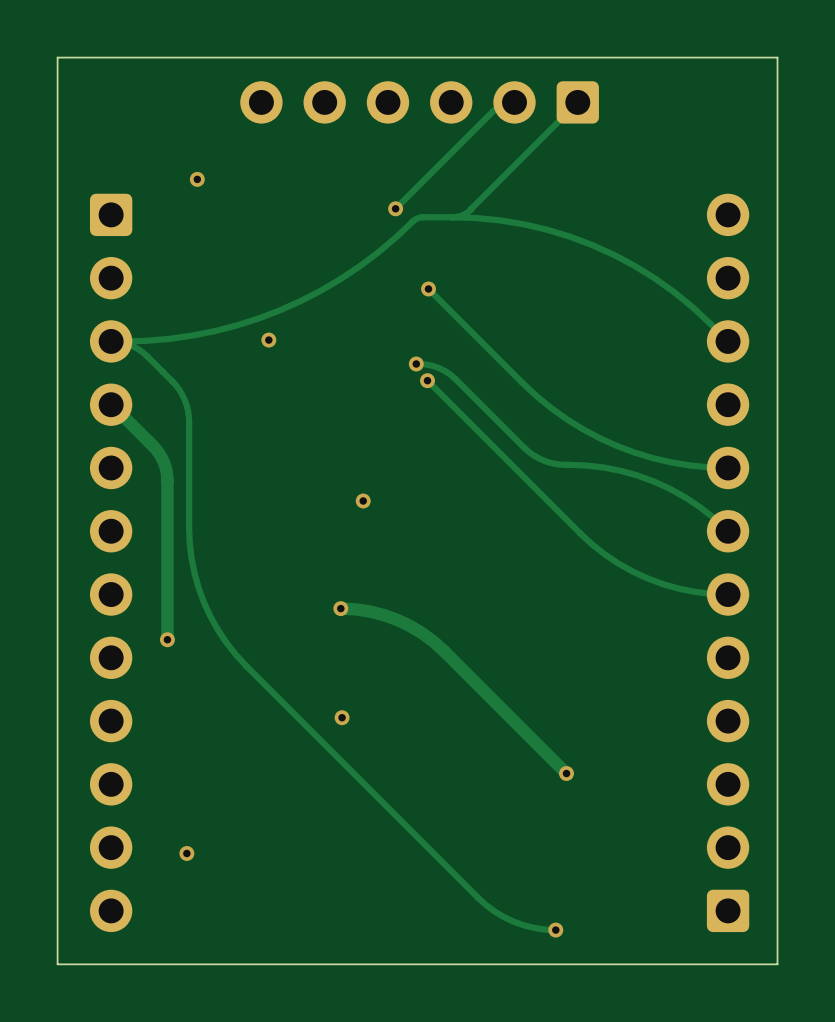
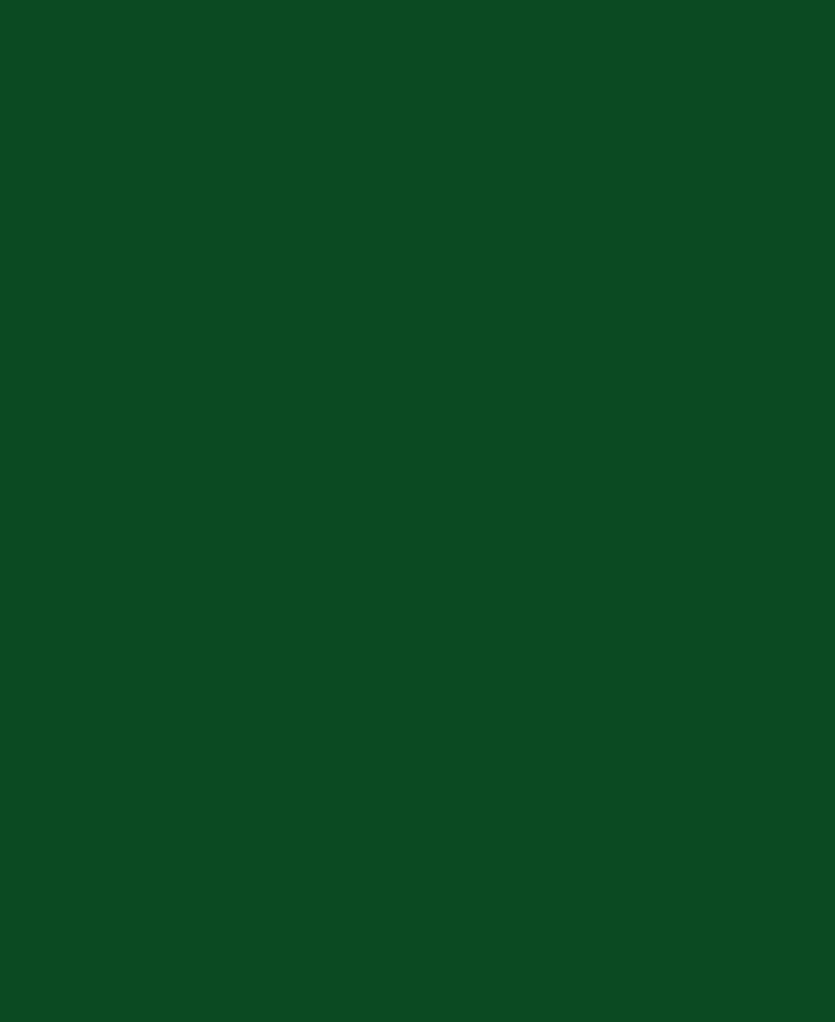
board edge: (777, 57) (57, 57) (57, 964) (777, 964) (777, 57) -> none
part: (419, 102) -> none
track: (514, 102) (502, 104) (495, 109) (395, 208) -> none
track: (577, 102) (471, 209) (462, 215) (452, 217) -> none
via: (197, 179) -> none
via: (395, 208) -> none
track: (452, 217) (423, 217) (415, 219) (378, 252) (341, 278) (300, 300) (258, 318) (192, 335) (146, 340) (111, 341) (126, 343) (143, 353) (176, 385) (184, 399) (188, 416) (189, 527) (194, 573) (204, 602) (218, 630) (246, 666) -> none
track: (452, 217) (500, 220) (523, 224) (547, 229) (592, 245) (635, 266) (655, 278) (693, 307) (728, 341) -> none
track: (428, 289) (536, 395) (582, 428) (616, 445) (652, 458) (690, 465) (728, 467) -> none
via: (428, 289) -> none
via: (268, 340) -> none
track: (416, 363) (432, 365) (450, 374) (524, 447) (537, 457) (554, 463) (586, 465) (621, 471) (654, 481) (700, 507) (728, 531) -> none
via: (416, 363) -> none
track: (427, 380) (580, 533) (605, 554) (633, 571) (663, 584) (695, 591) (728, 594) -> none
via: (427, 380) -> none
track: (112, 405) (156, 449) (166, 471) (167, 639) -> none
via: (363, 500) -> none
part: (111, 562) -> none
part: (728, 562) -> none
track: (340, 608) (383, 614) (422, 633) (444, 651) (566, 773) -> none
via: (340, 608) -> none
via: (167, 639) -> none
track: (246, 666) (486, 905) (513, 921) (534, 927) (555, 930) -> none
via: (342, 717) -> none
via: (566, 773) -> none
via: (186, 853) -> none
via: (555, 930) -> none

